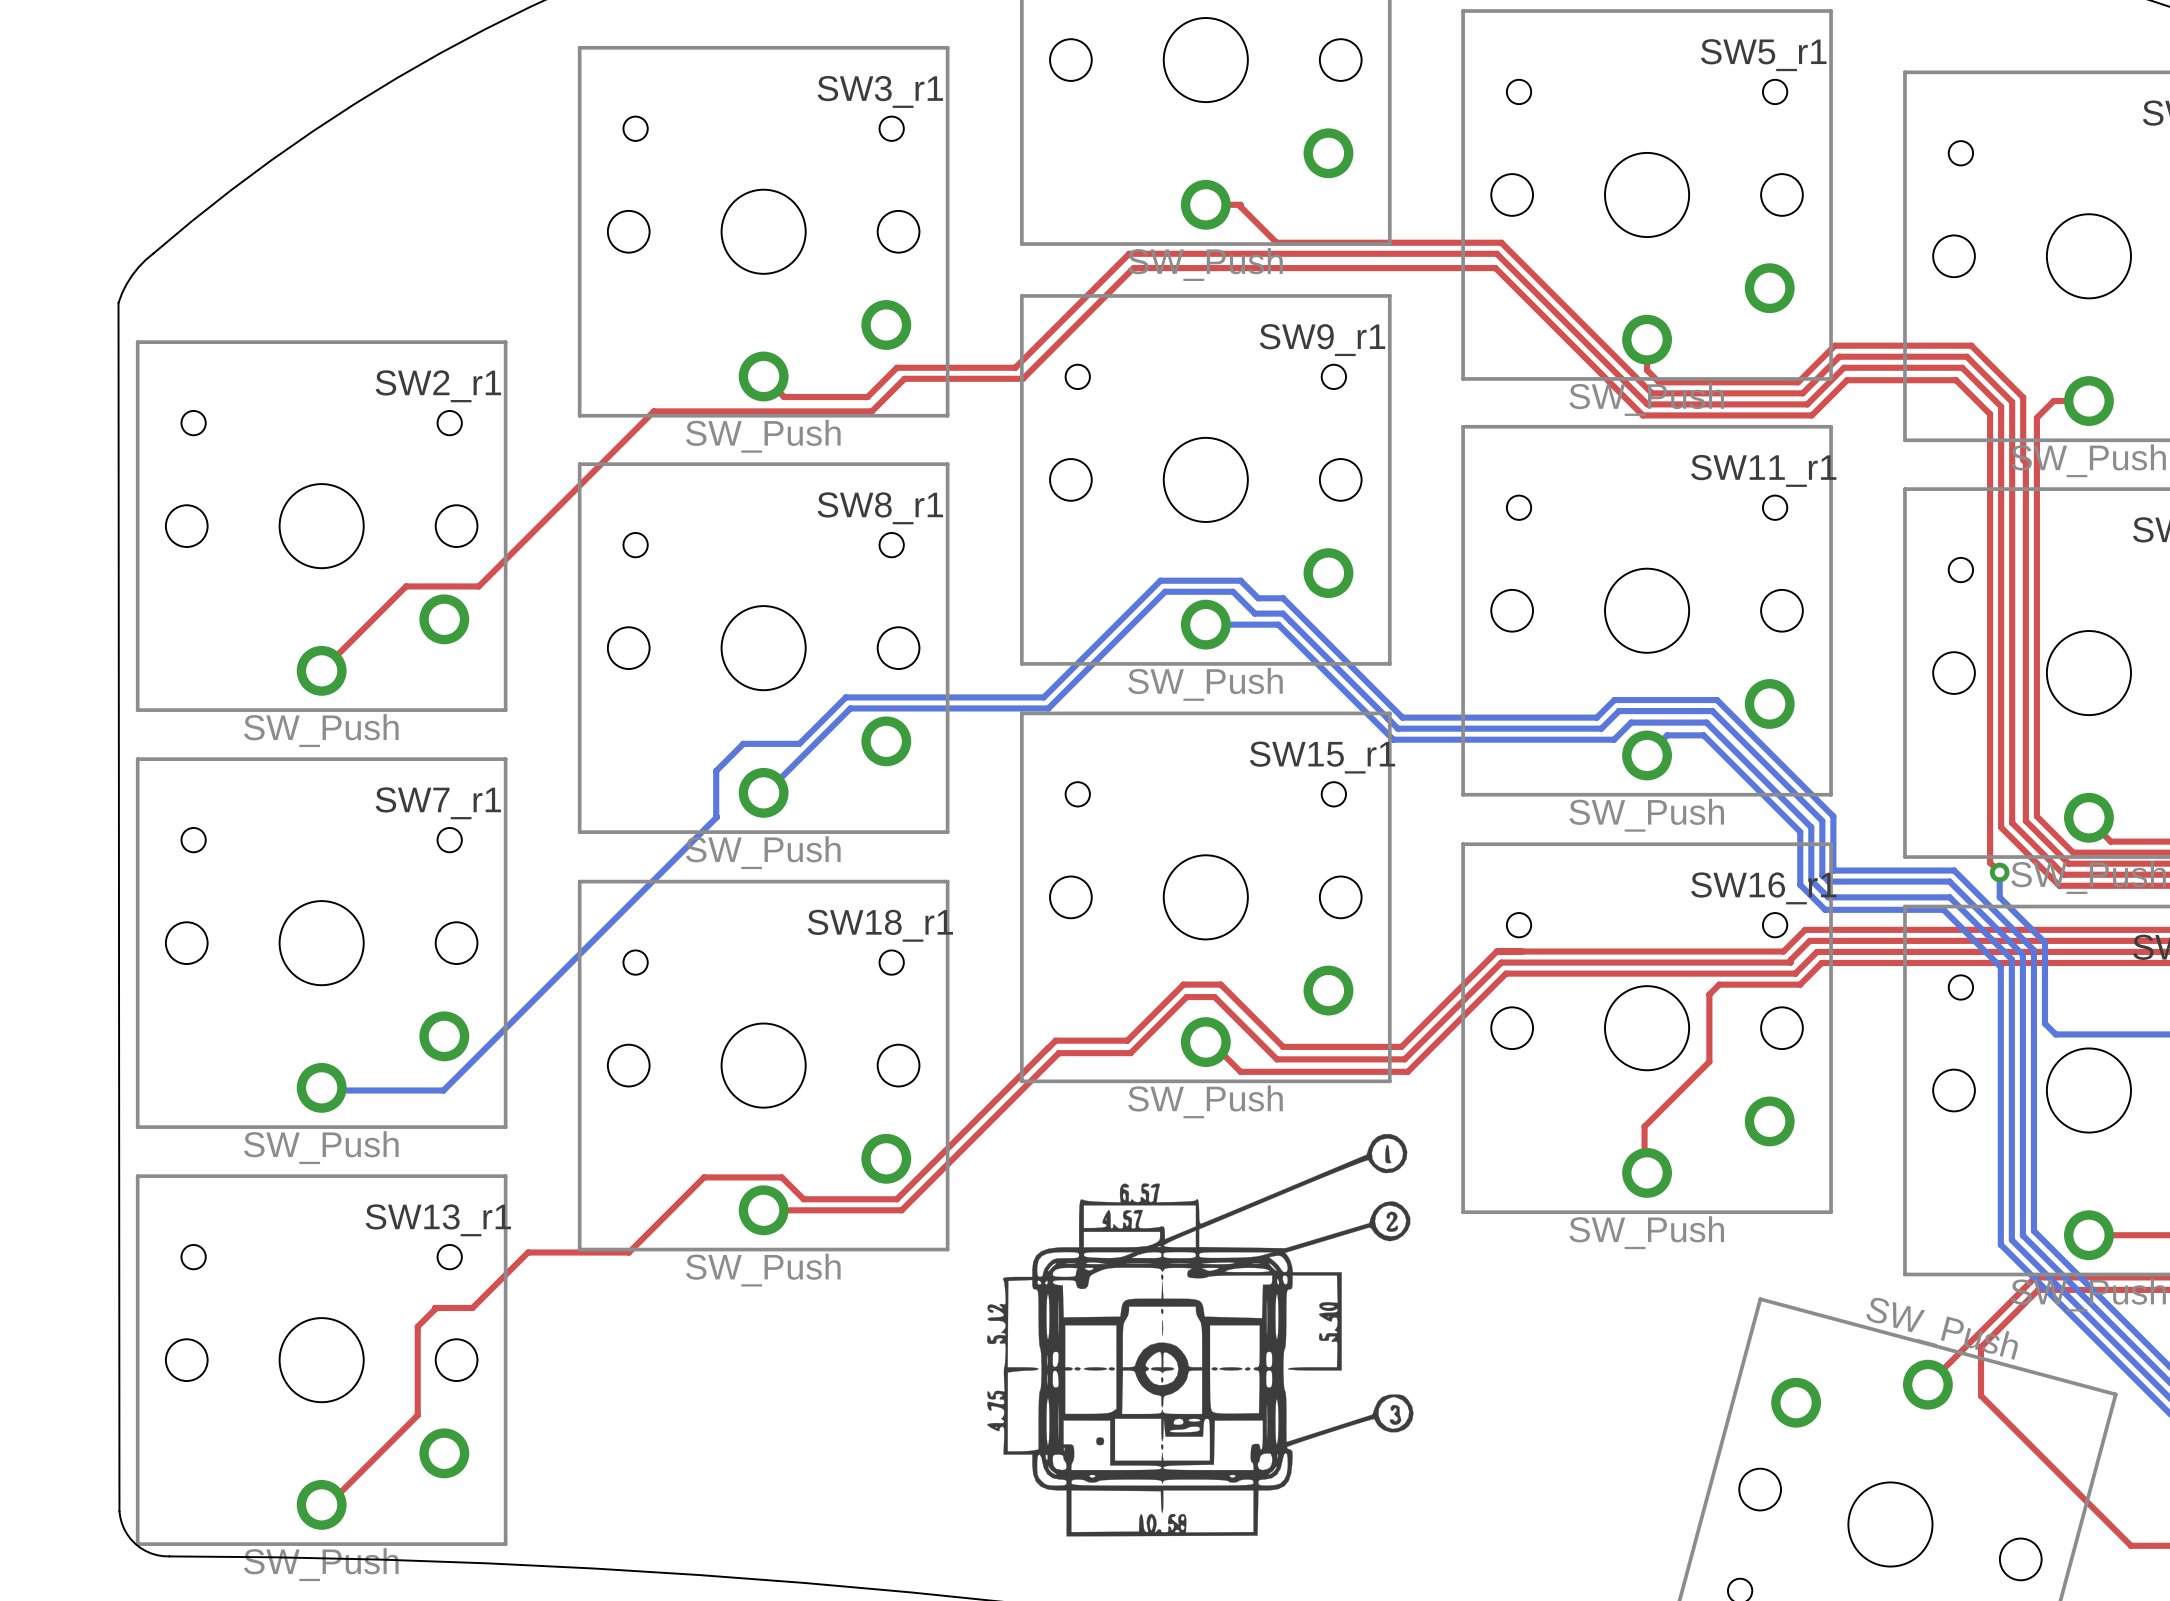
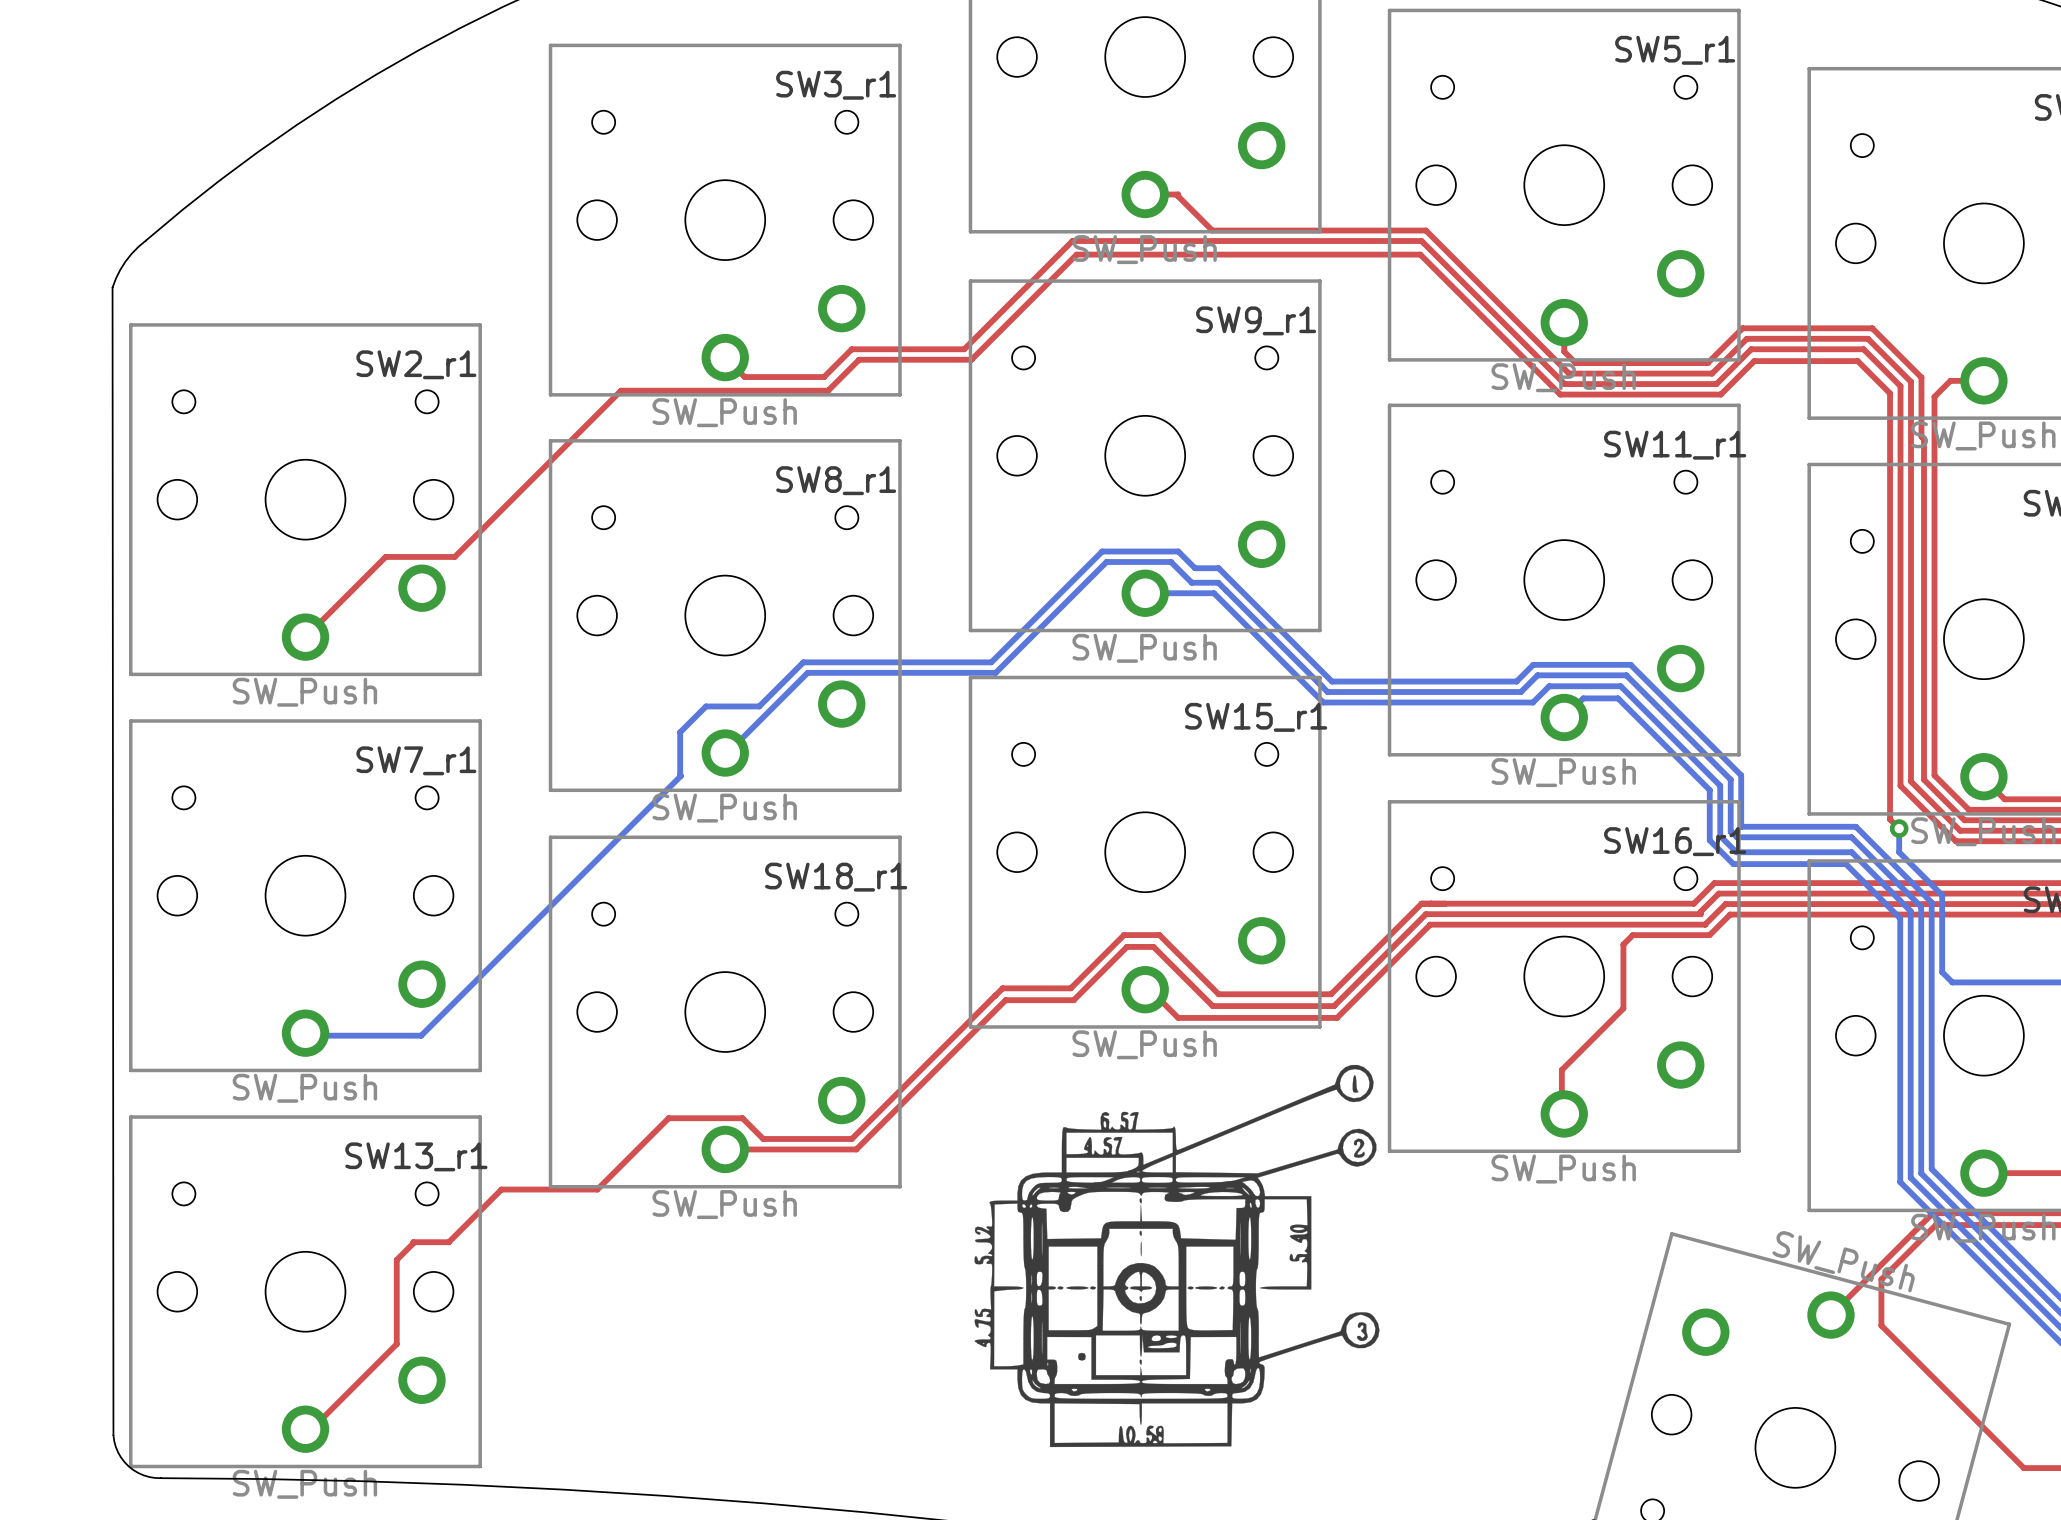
drawing position: (1200, 1335) -> (1177, 1256)

